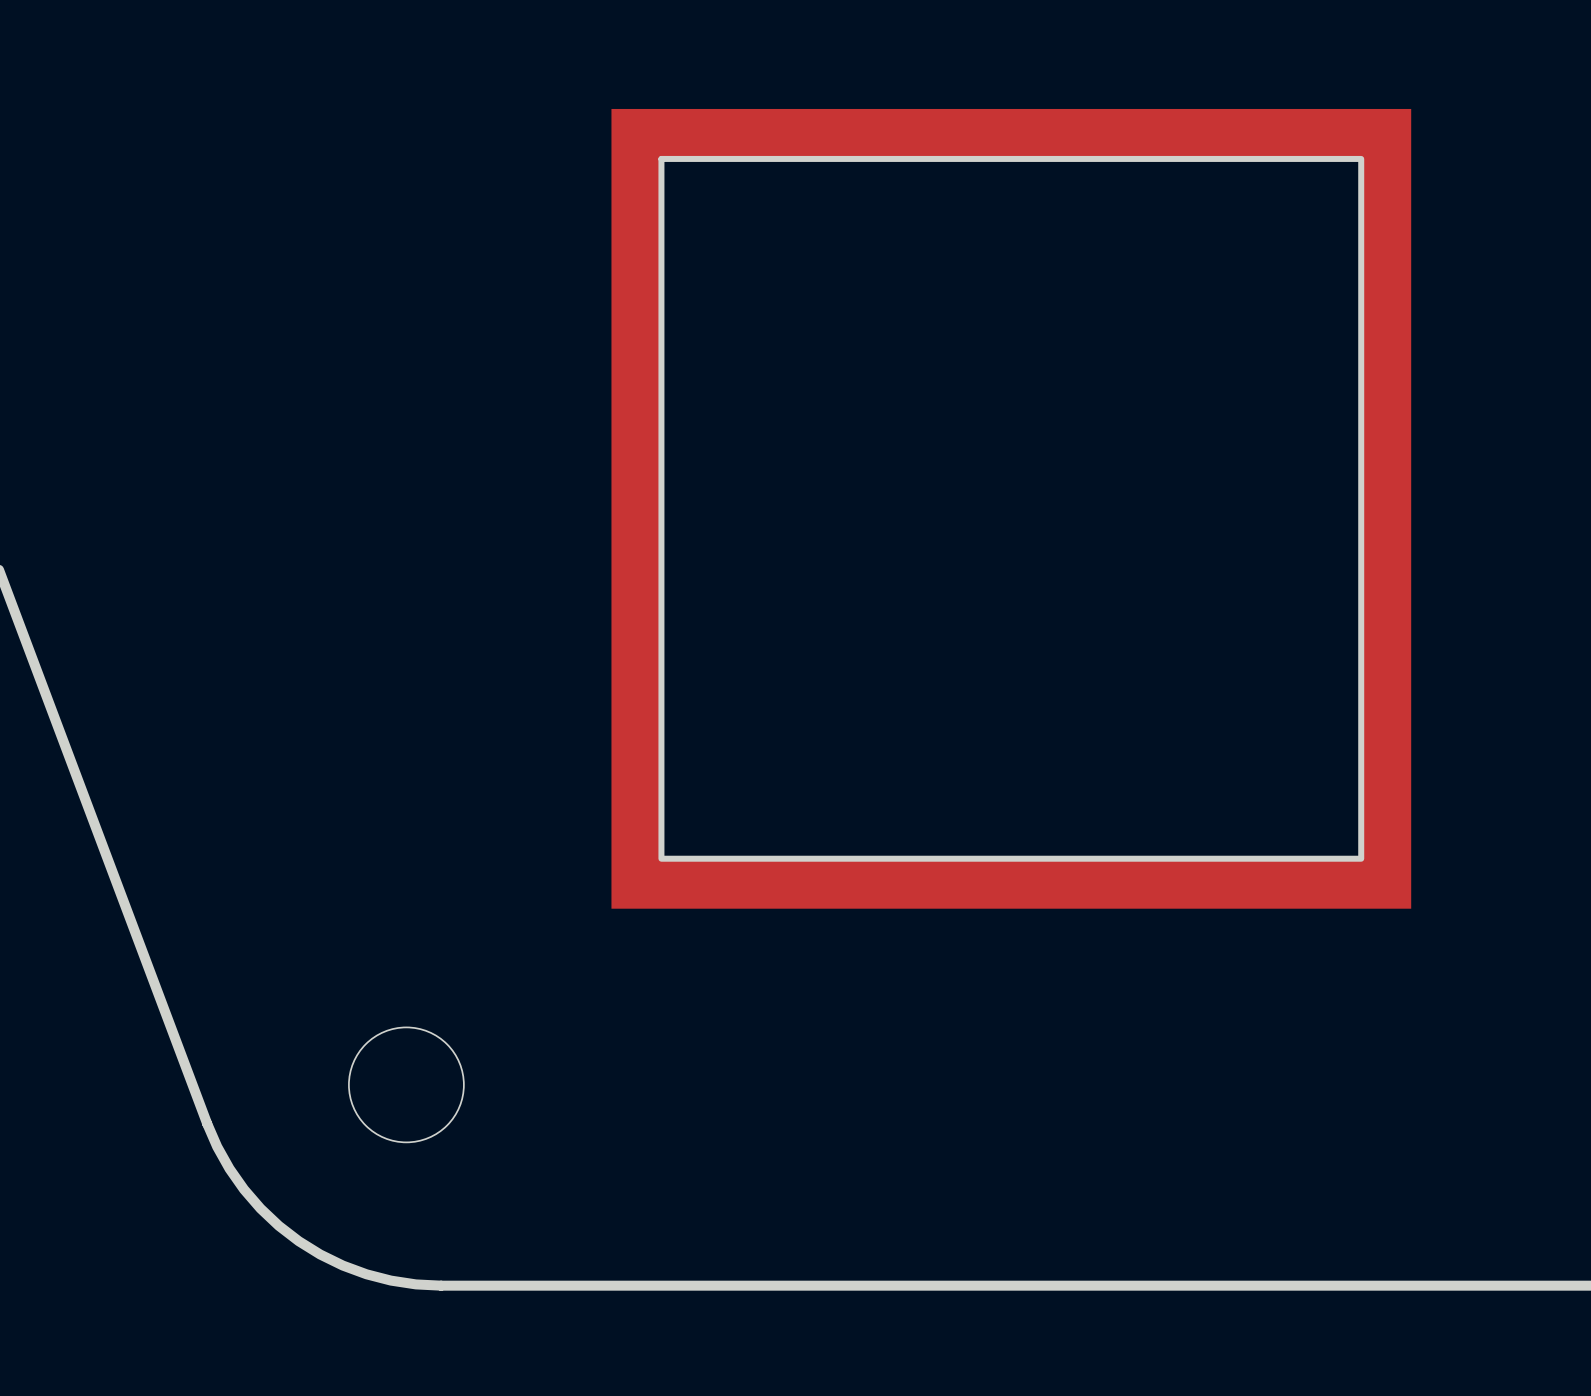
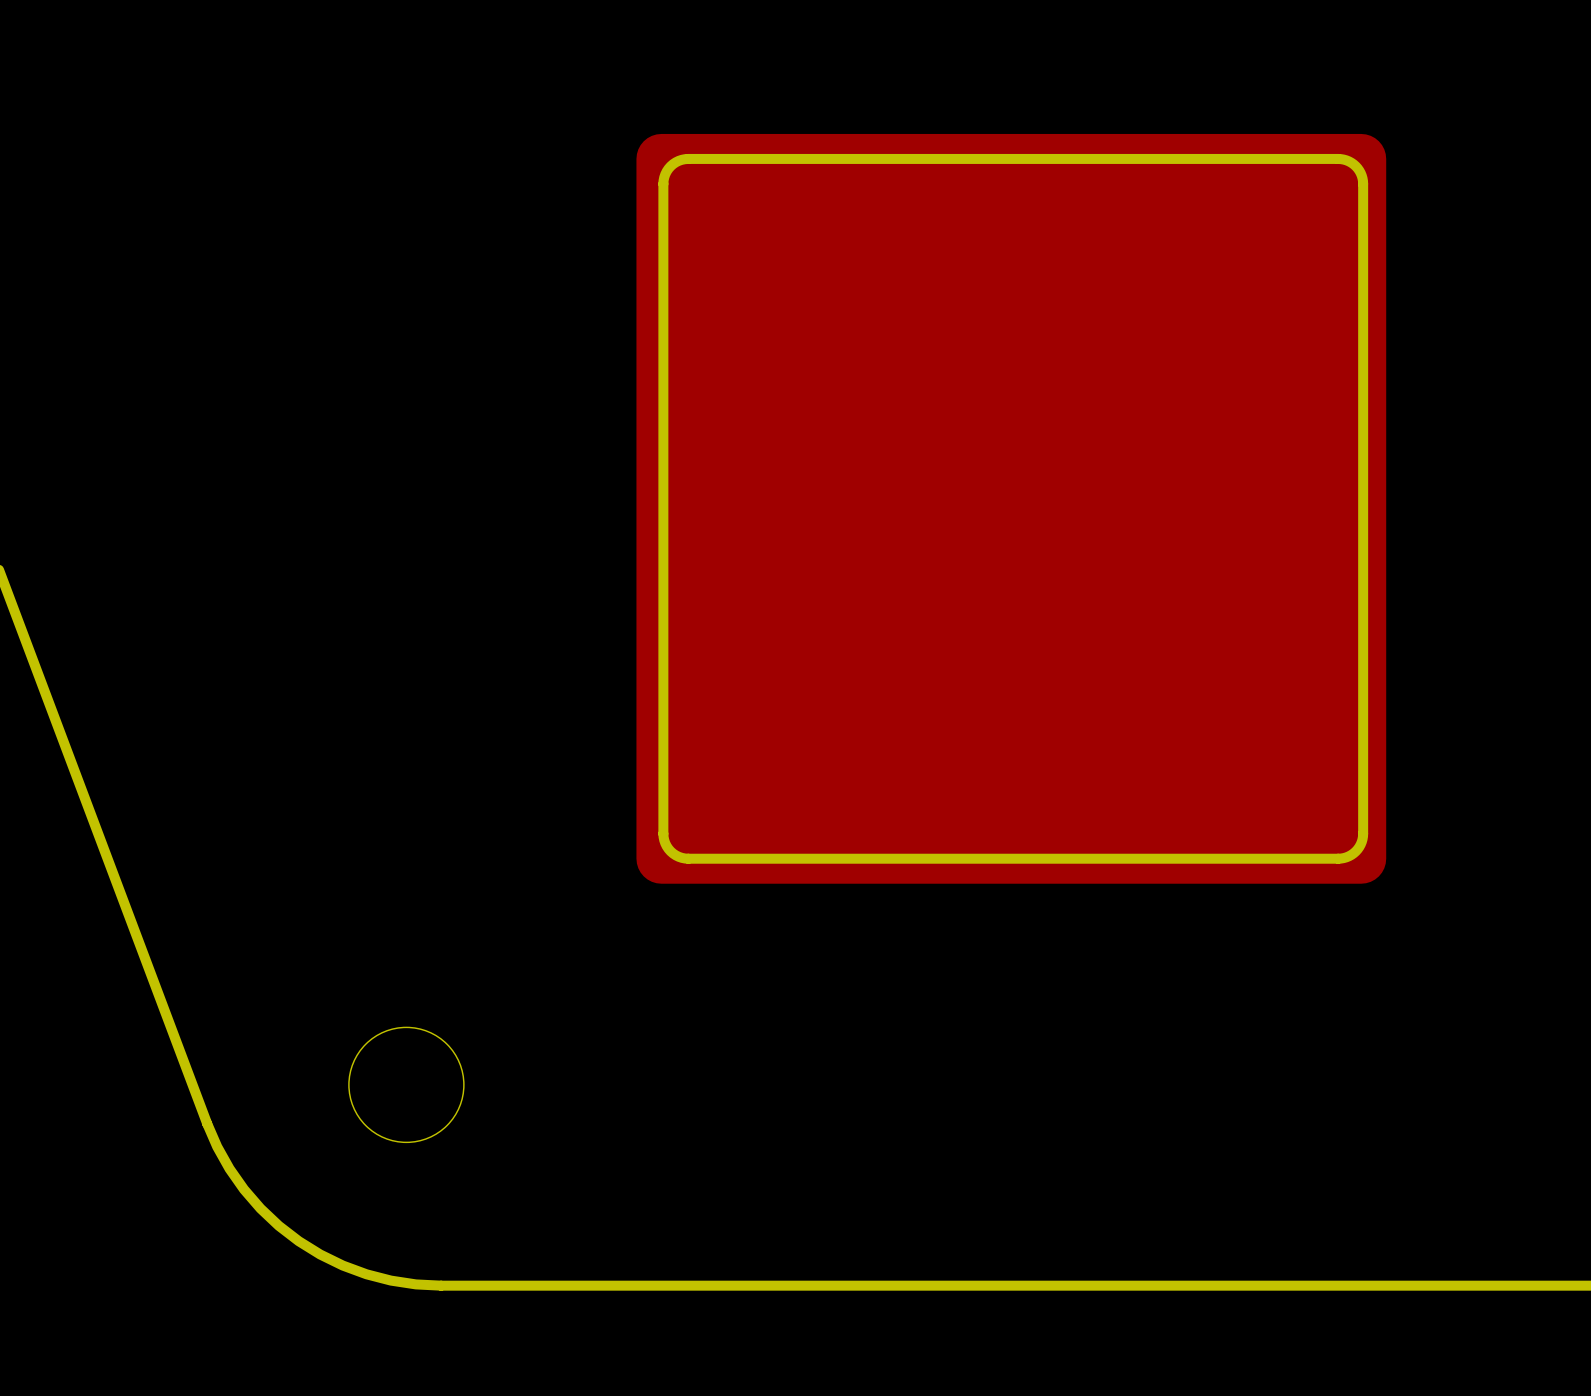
part footprint: [611, 108, 1412, 909] -> [636, 133, 1387, 884]

